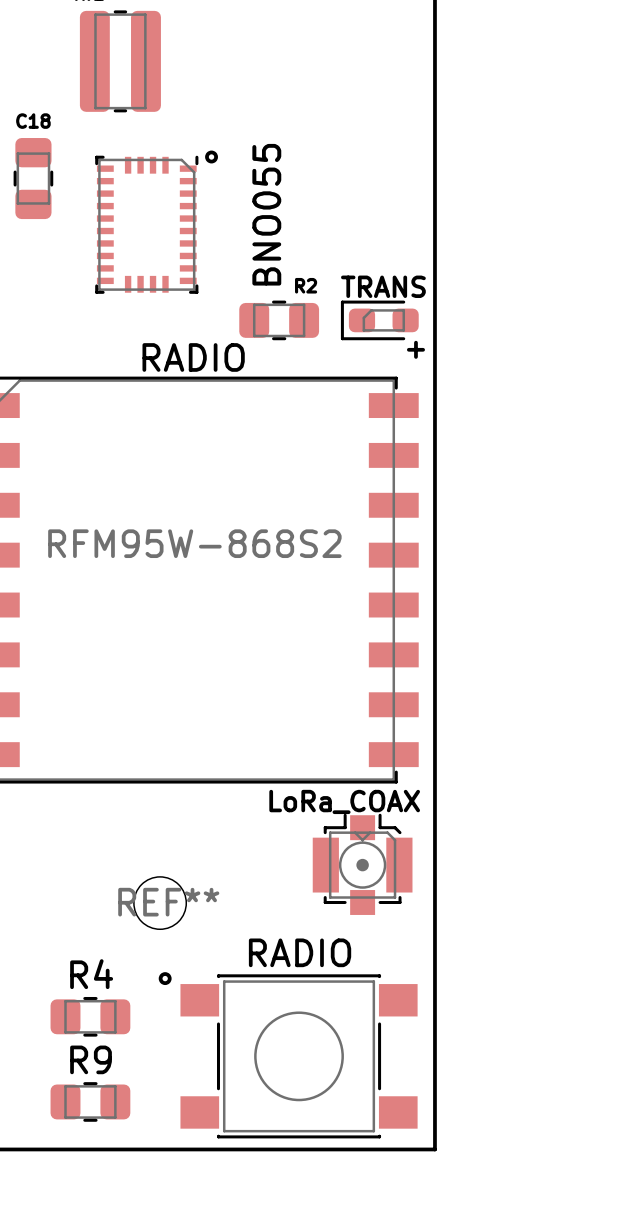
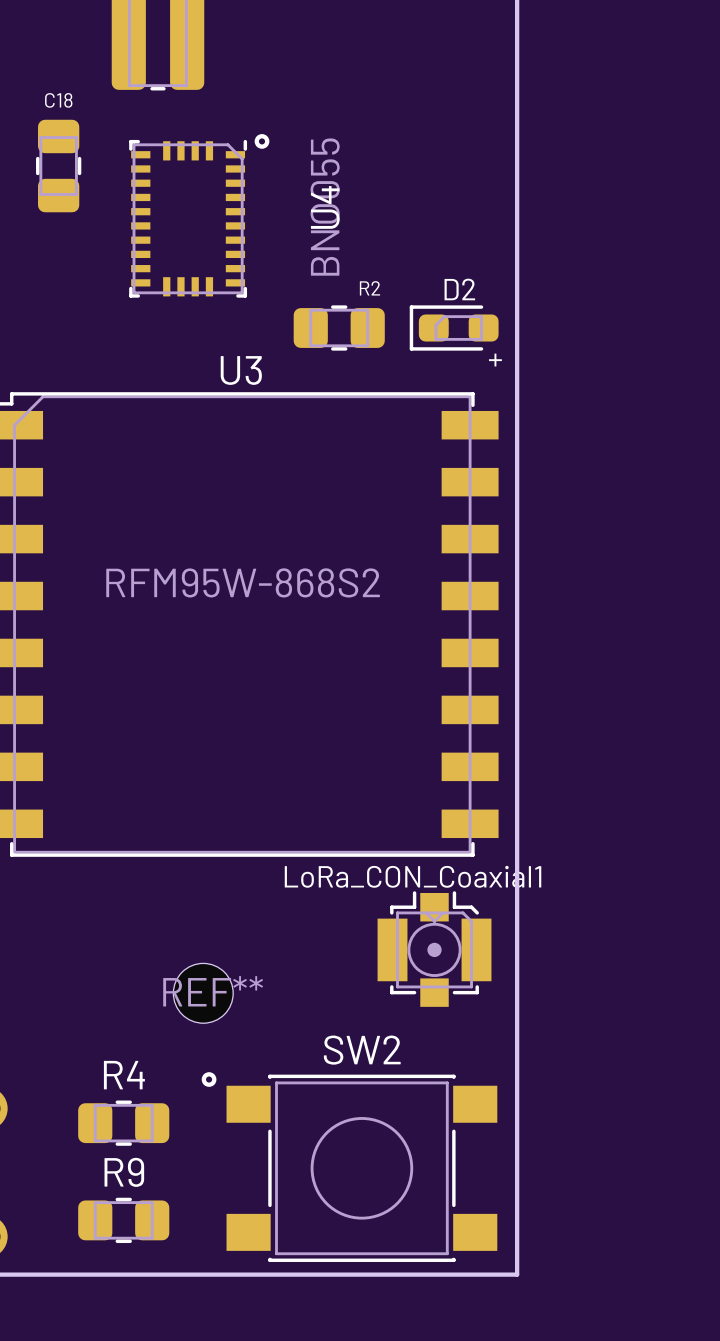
BNO055 name: BNO055 (266, 214) -> U4 (325, 207)
TRANS name: TRANS (383, 286) -> D2 (459, 289)
RADIO name: RADIO (193, 357) -> U3 (241, 370)
LoRa_COAX name: LoRa_COAX (344, 801) -> LoRa_CON_Coaxial1 (413, 876)
RADIO name: RADIO (300, 952) -> SW2 (362, 1050)

